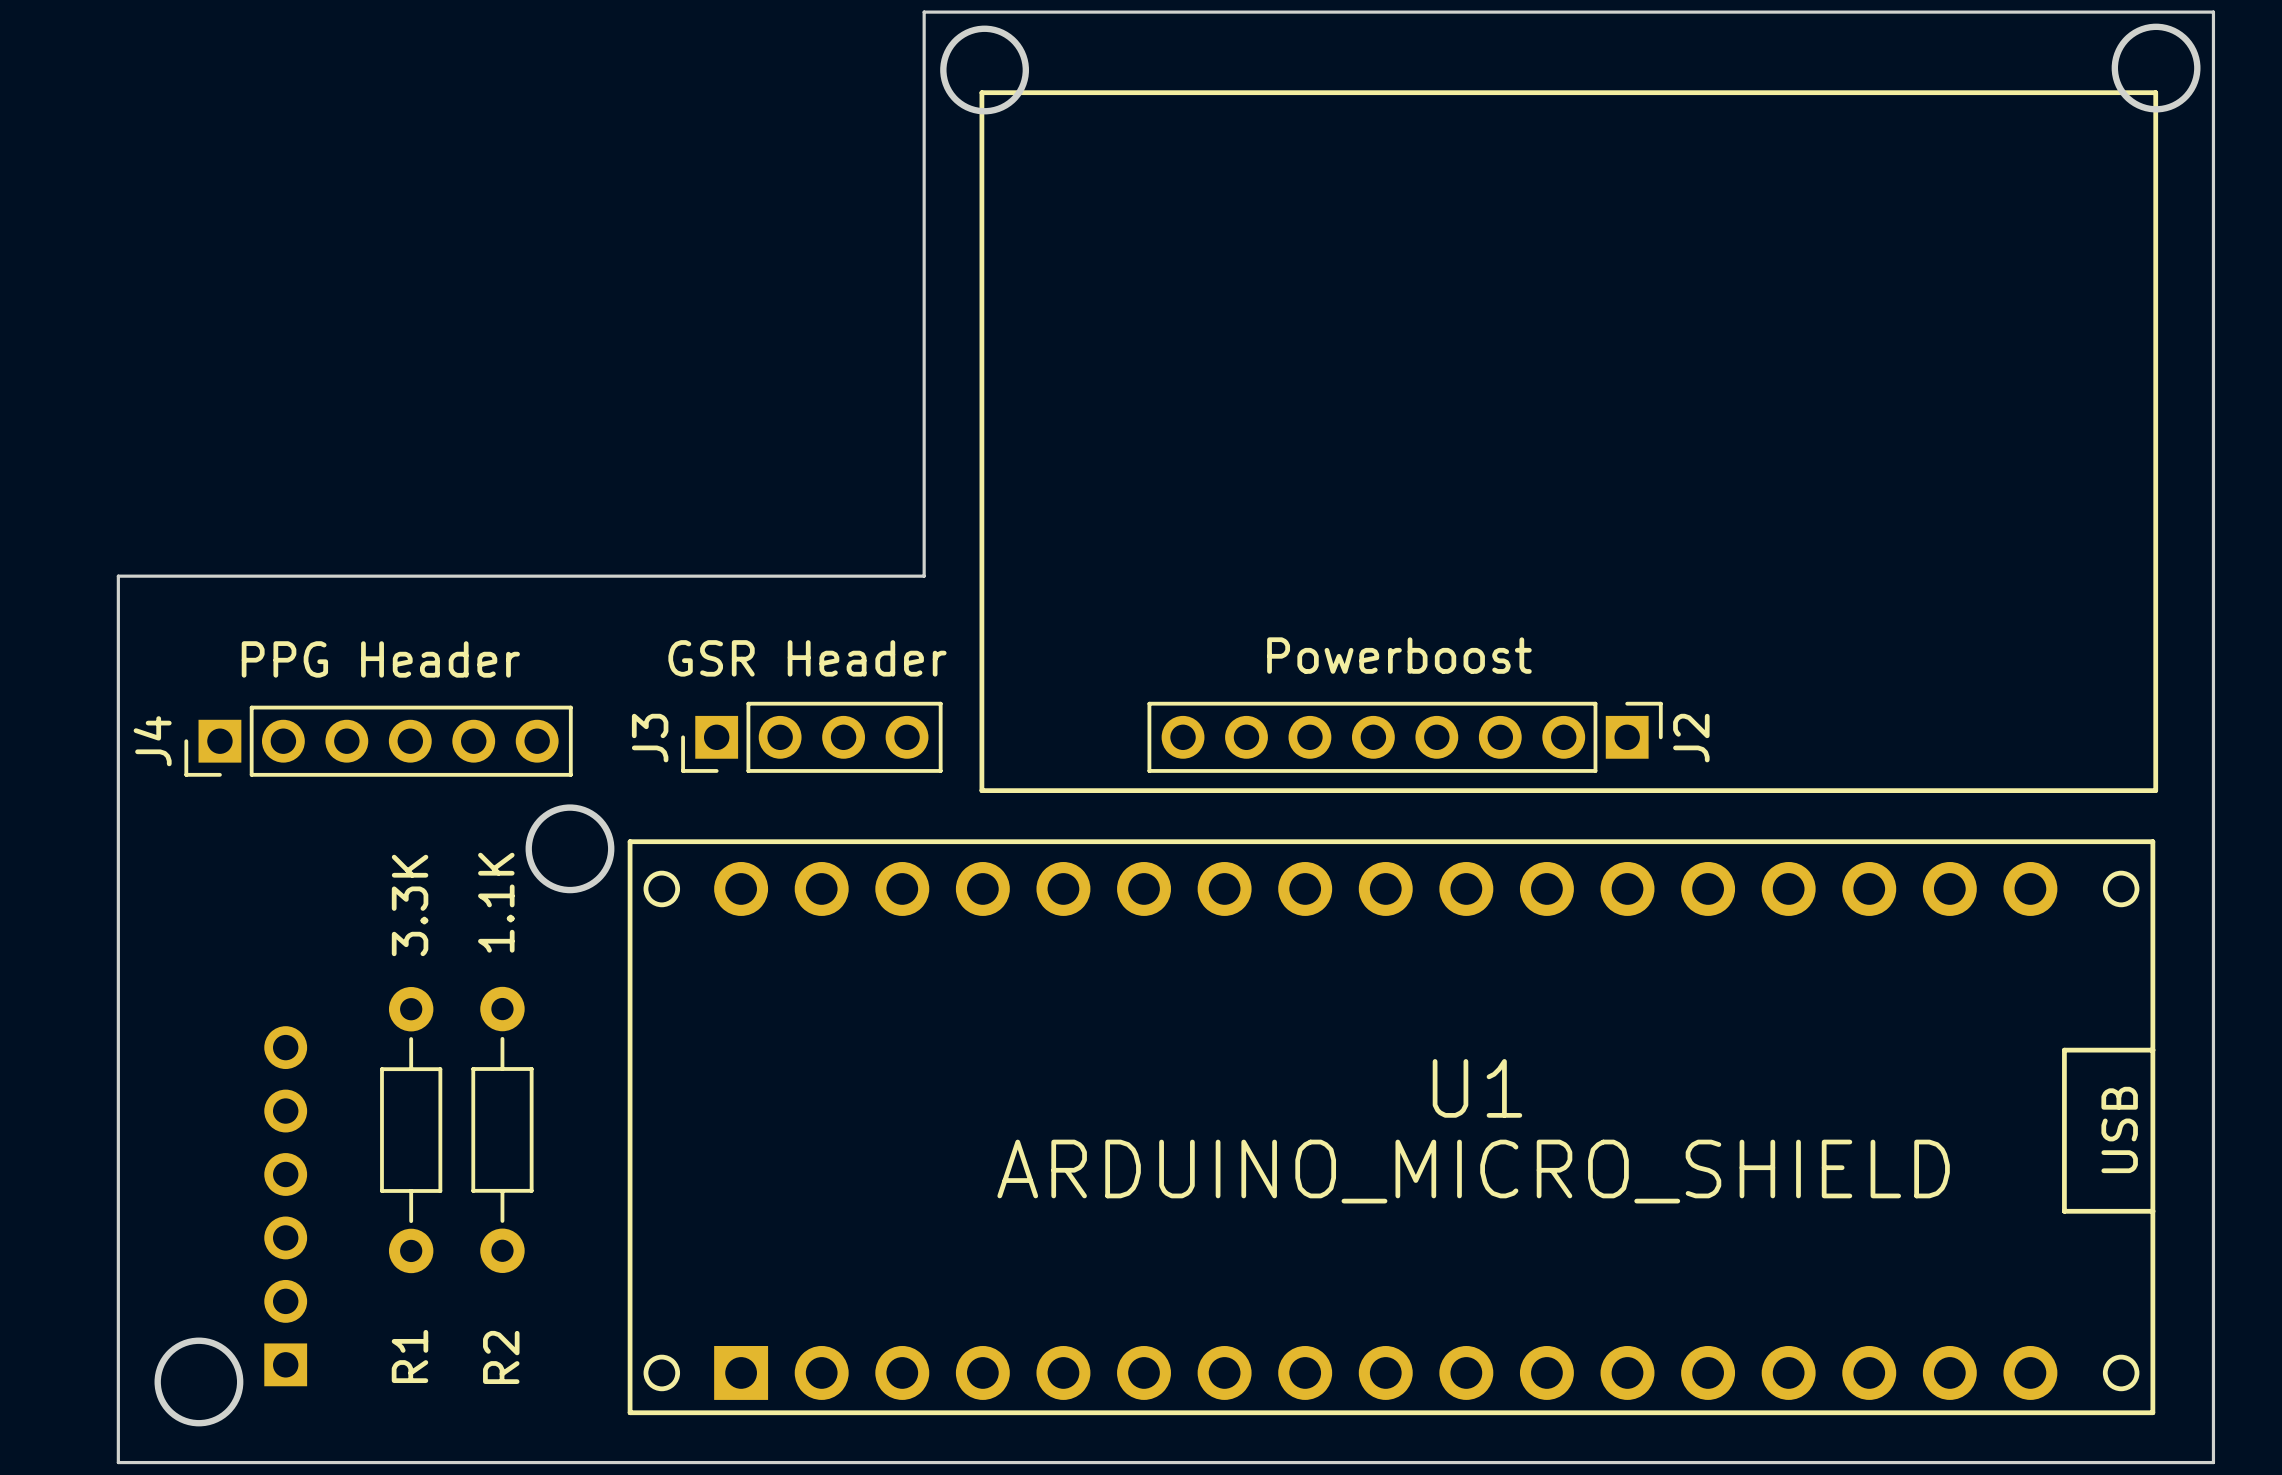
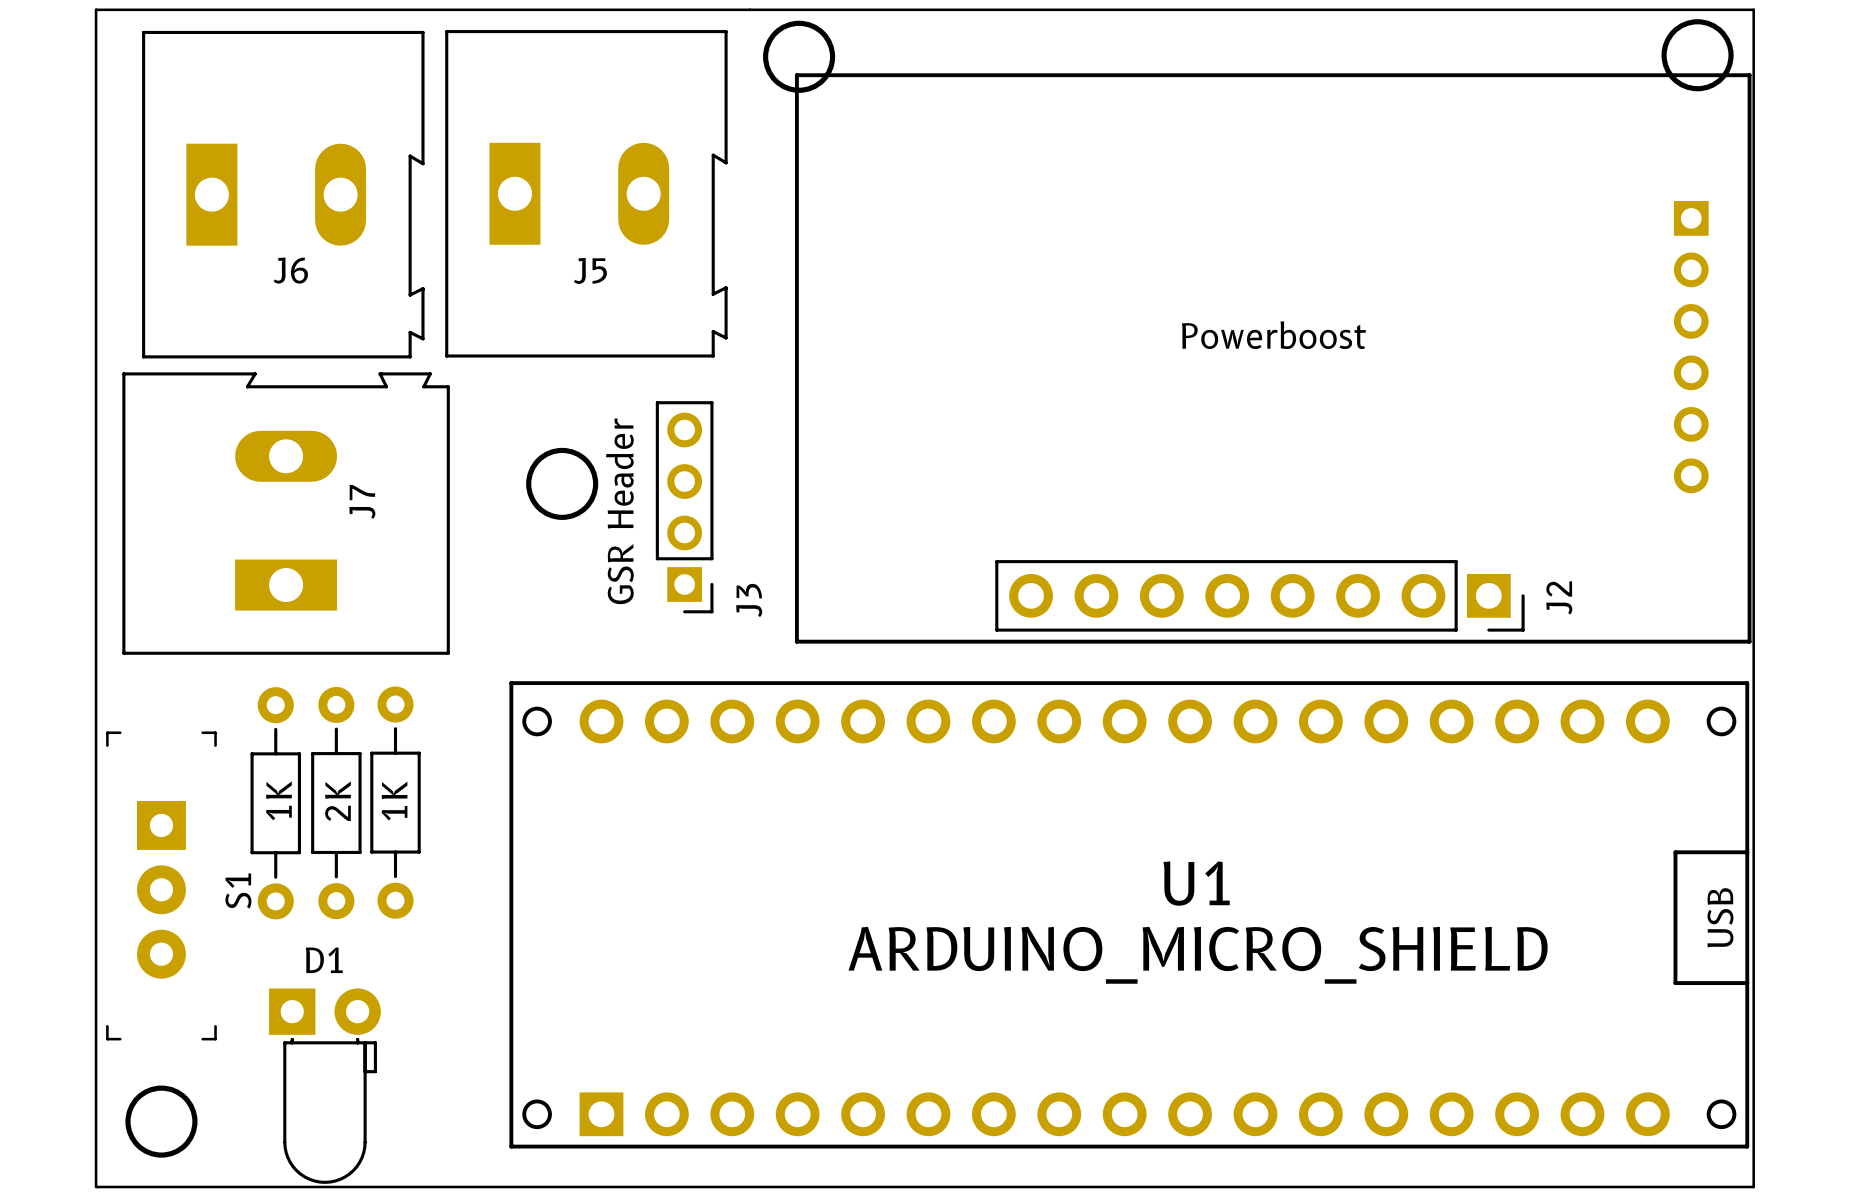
board edge: (924, 12) (924, 576) (118, 576) -> (750, 9) (96, 9) (96, 467)
board edge: (2160, 12) (2213, 12) (2213, 1462) (2160, 1462) -> (1753, 9) (1753, 1187)
round board edge position: (2156, 68) -> (1697, 55)
J5: none -> (586, 193)
J6: none -> (283, 194)
part: none -> (1691, 347)
J7: none -> (286, 513)
J2 value position: Powerboost (1399, 655) -> Powerboost (1273, 335)
J2 footprint: [1147, 701, 1663, 773] -> [995, 560, 1525, 632]
J3 rotation: 0° (811, 737) -> 90° counterclockwise (684, 507)
J3 name position: J3 (650, 738) -> J3 (749, 600)
J2 name position: J2 (1691, 738) -> J2 (1559, 597)
J4: PPG Header (378, 741) -> none
round board edge position: (569, 848) -> (562, 483)
part: none -> 1K (395, 802)
part: none -> 1K (275, 803)
part: none -> 2K (336, 803)
S1: none -> (161, 885)
R2: 1.1K (502, 1129) -> none
R1: 3.3K (411, 1130) -> none
part: (285, 1206) -> none
D1: none -> (324, 1086)

